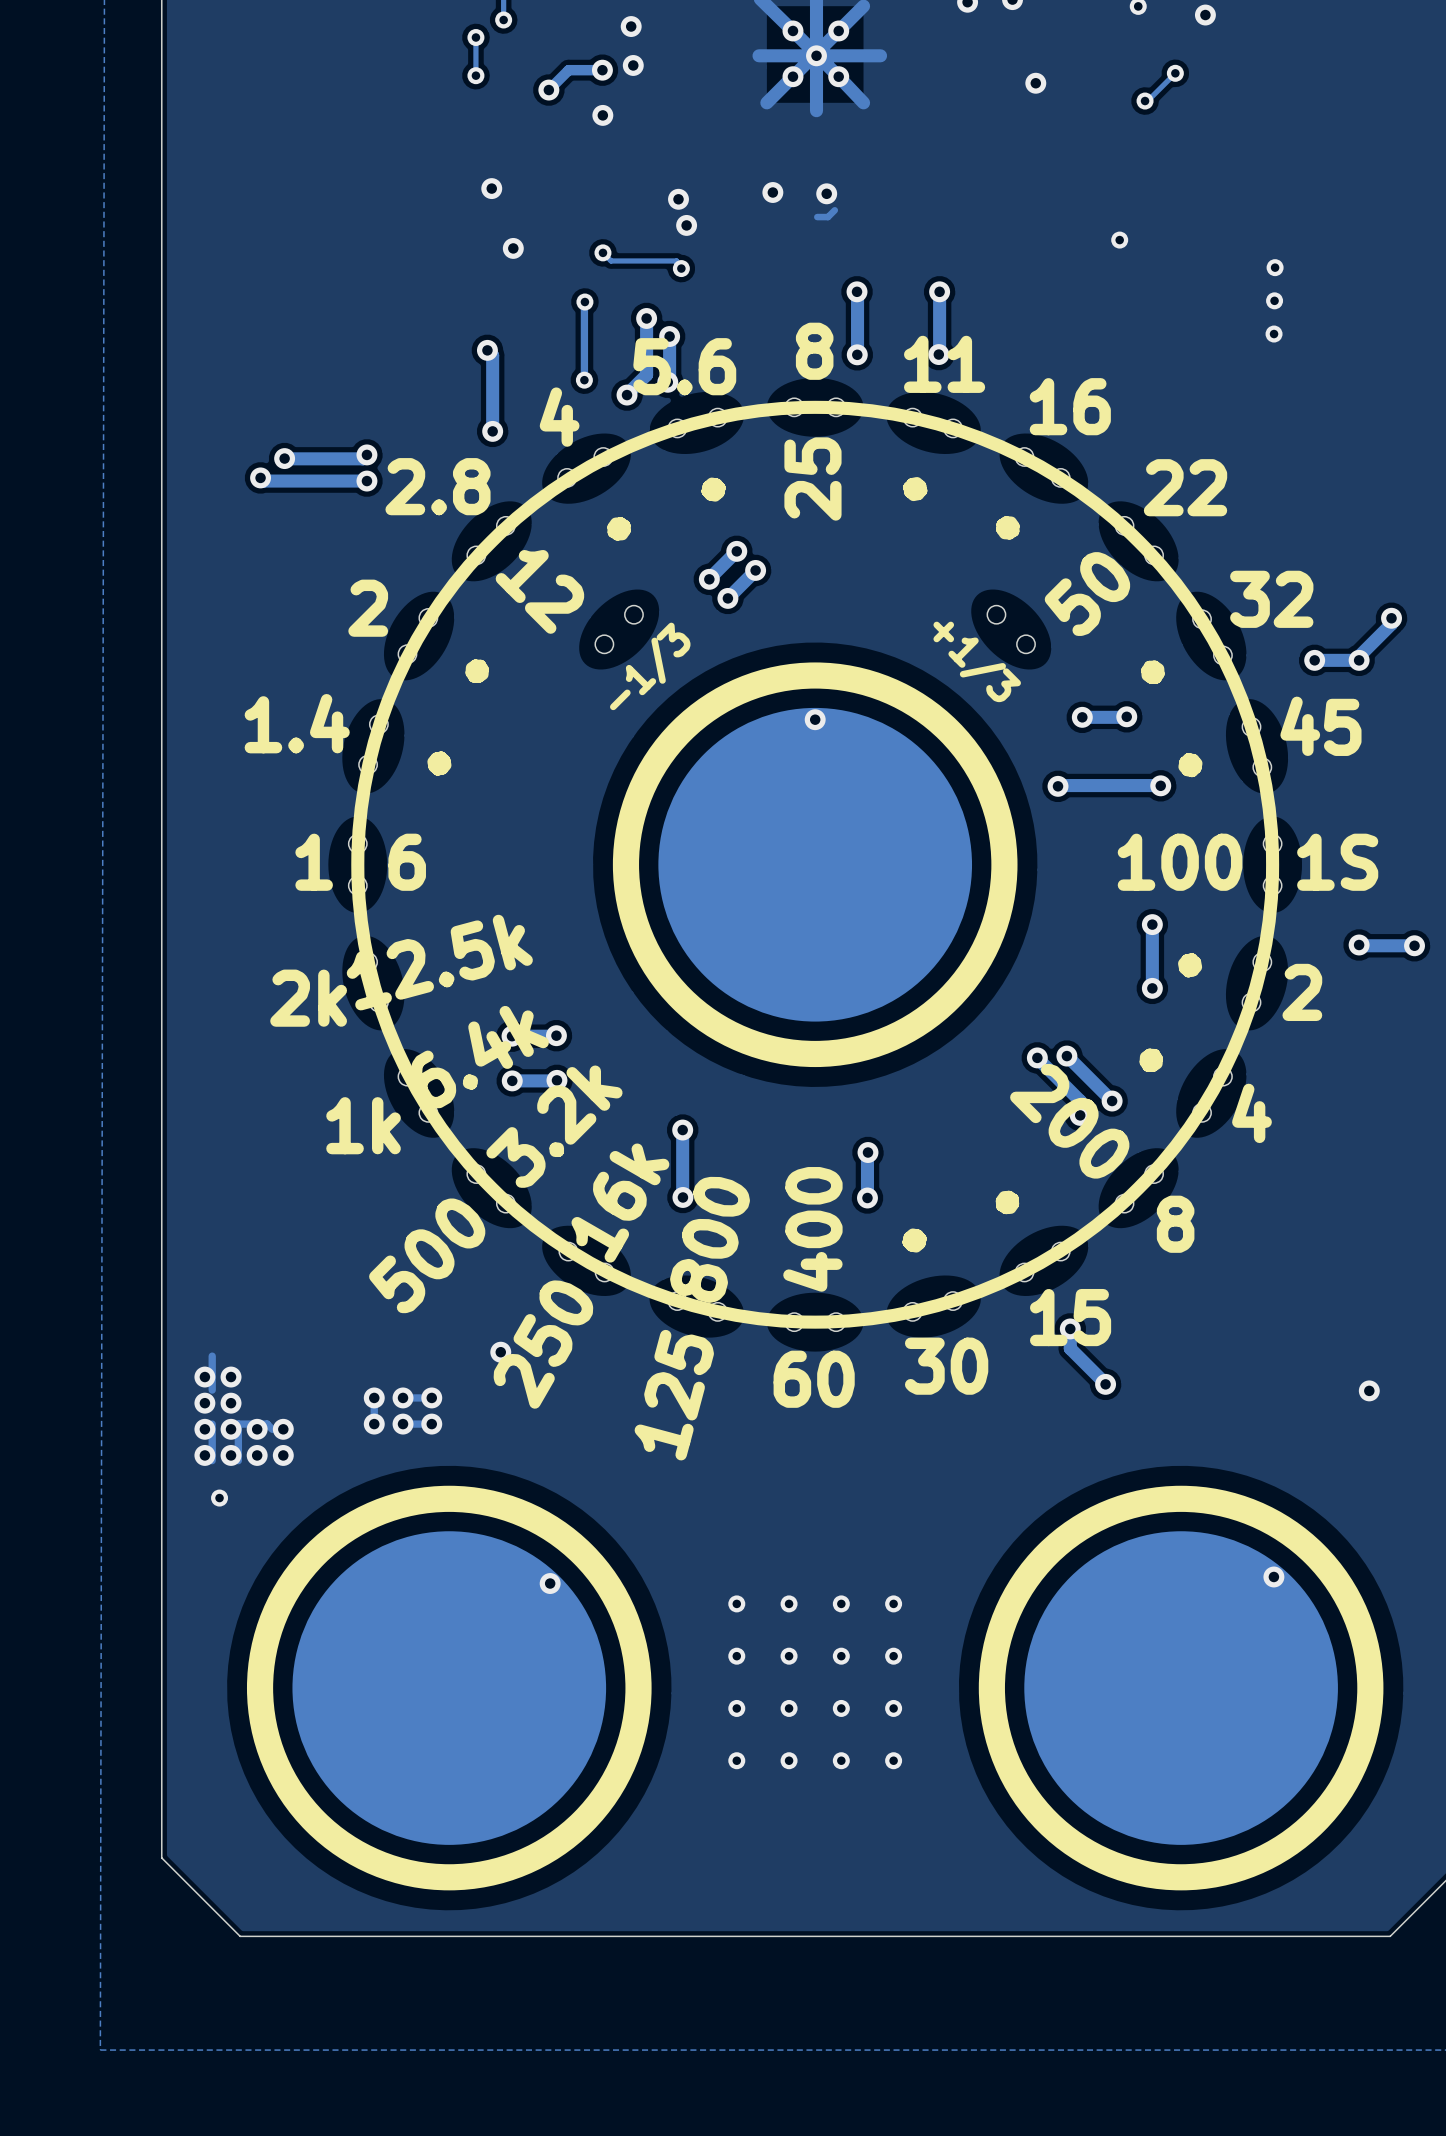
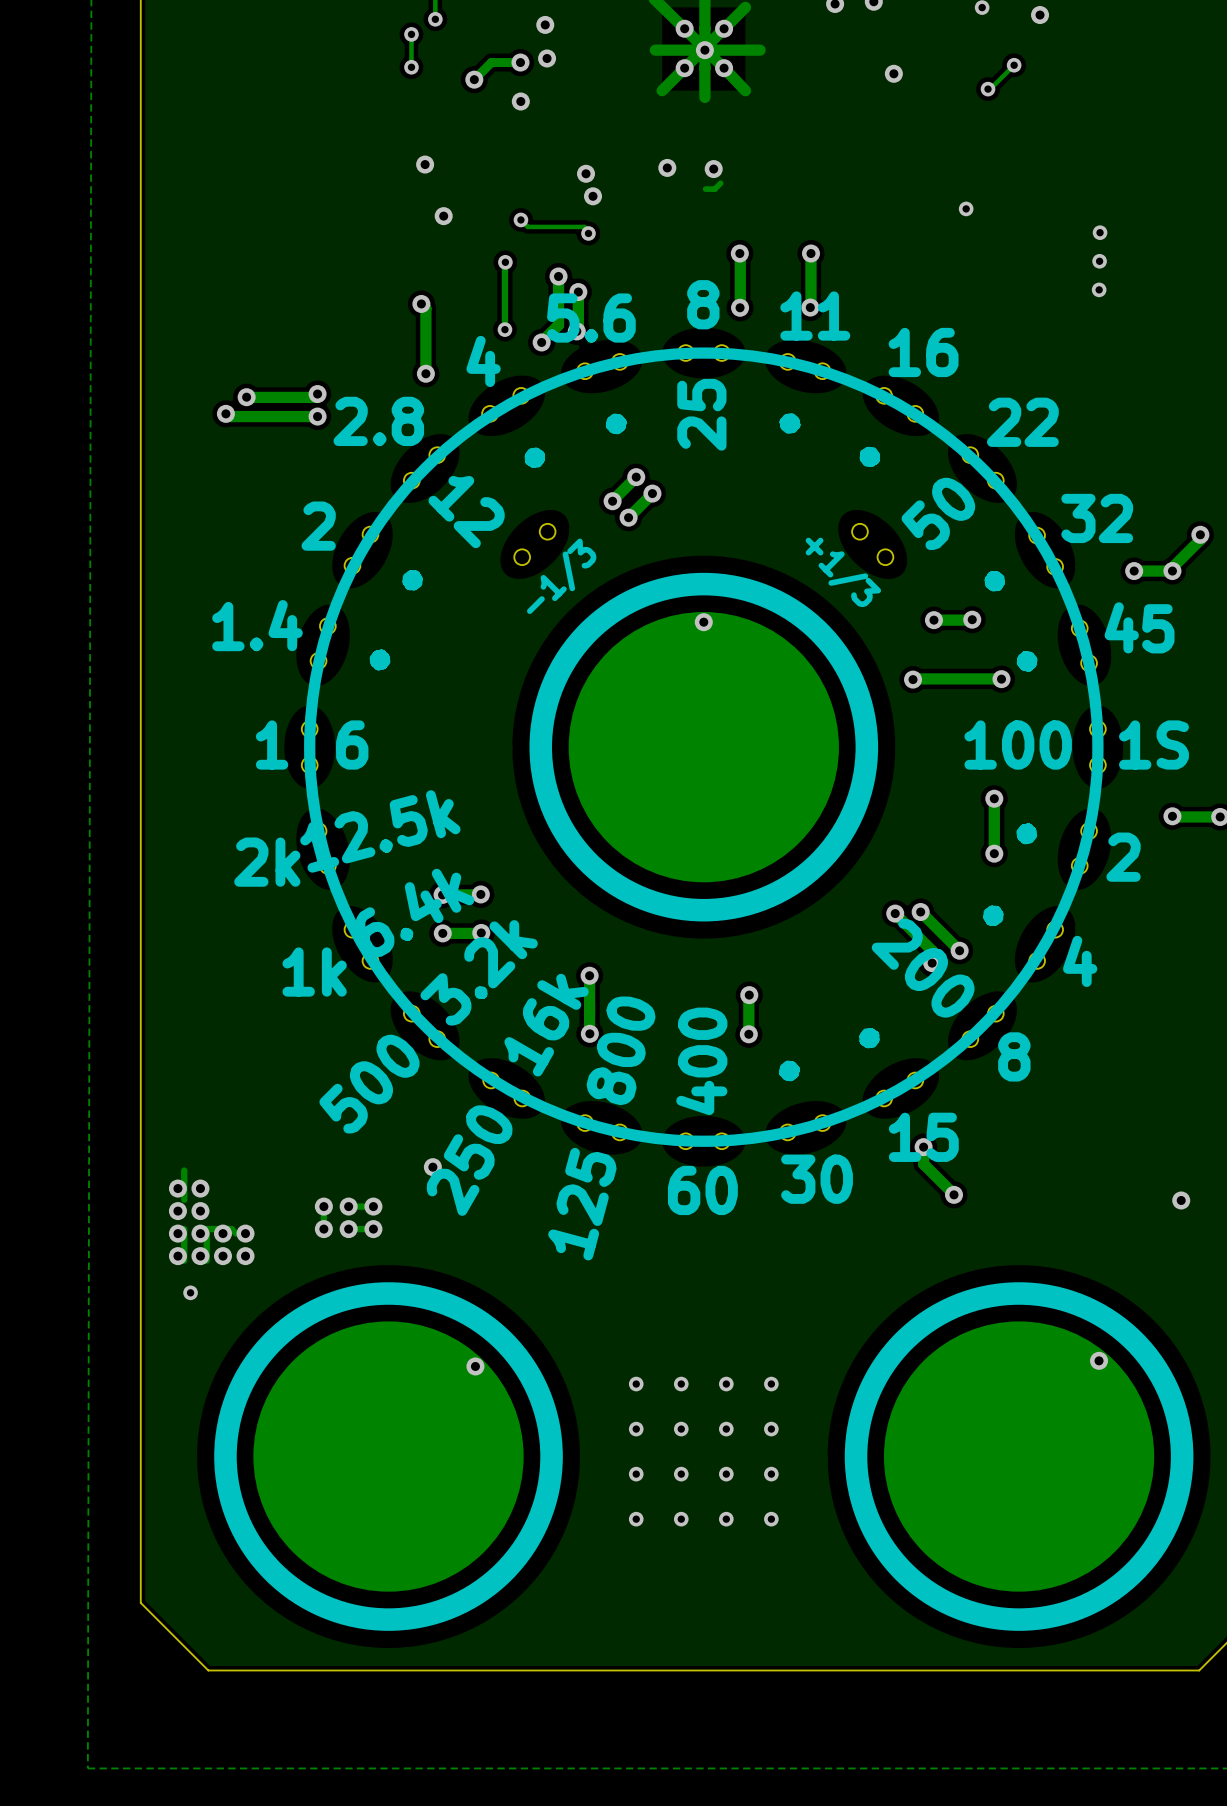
text position: 16k (620, 1203) -> 16k (546, 1025)
text position: 800 (710, 1239) -> 800 (621, 1050)

